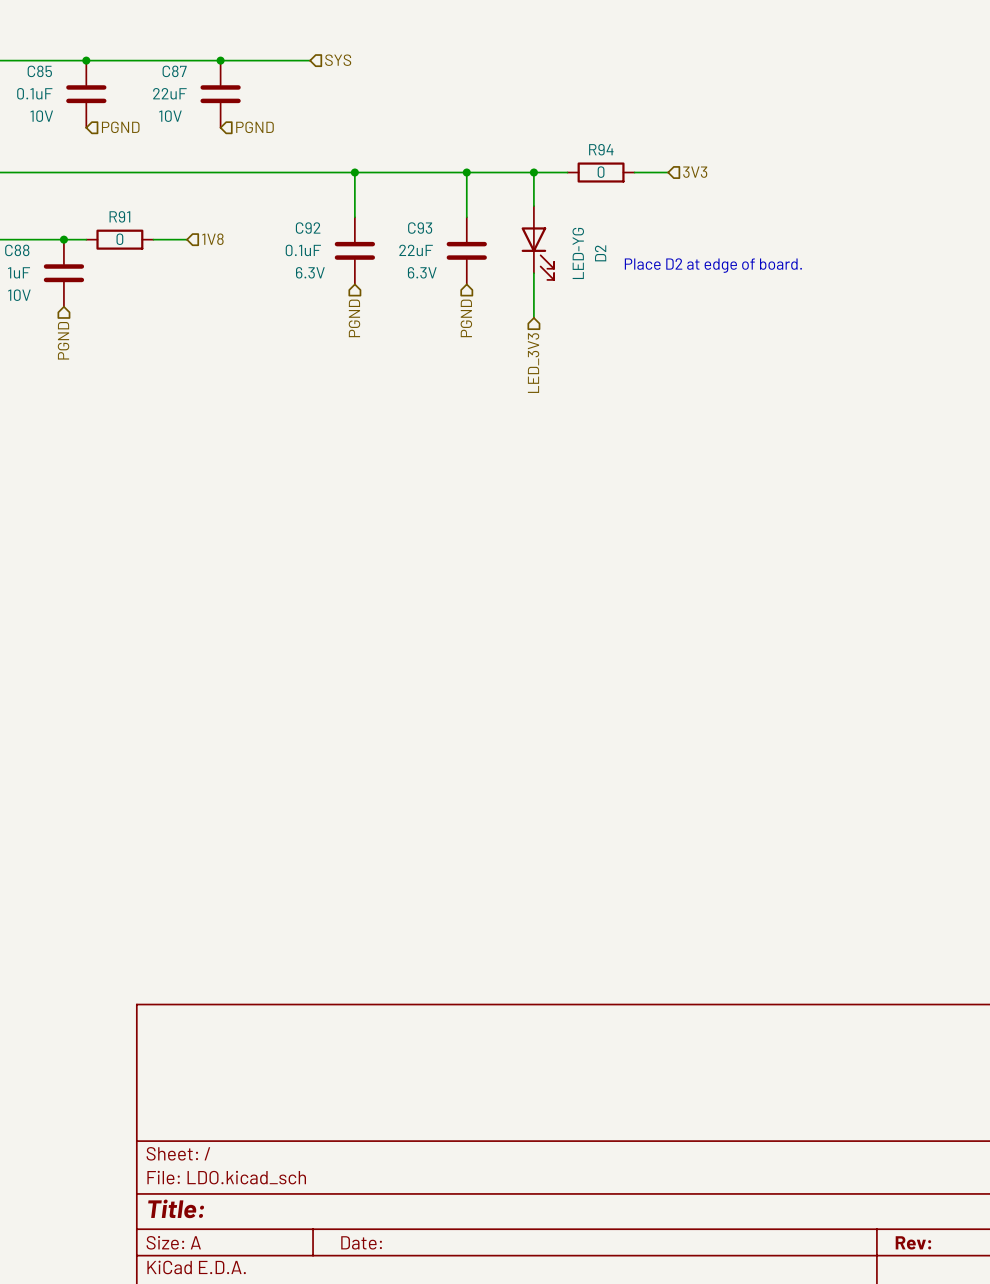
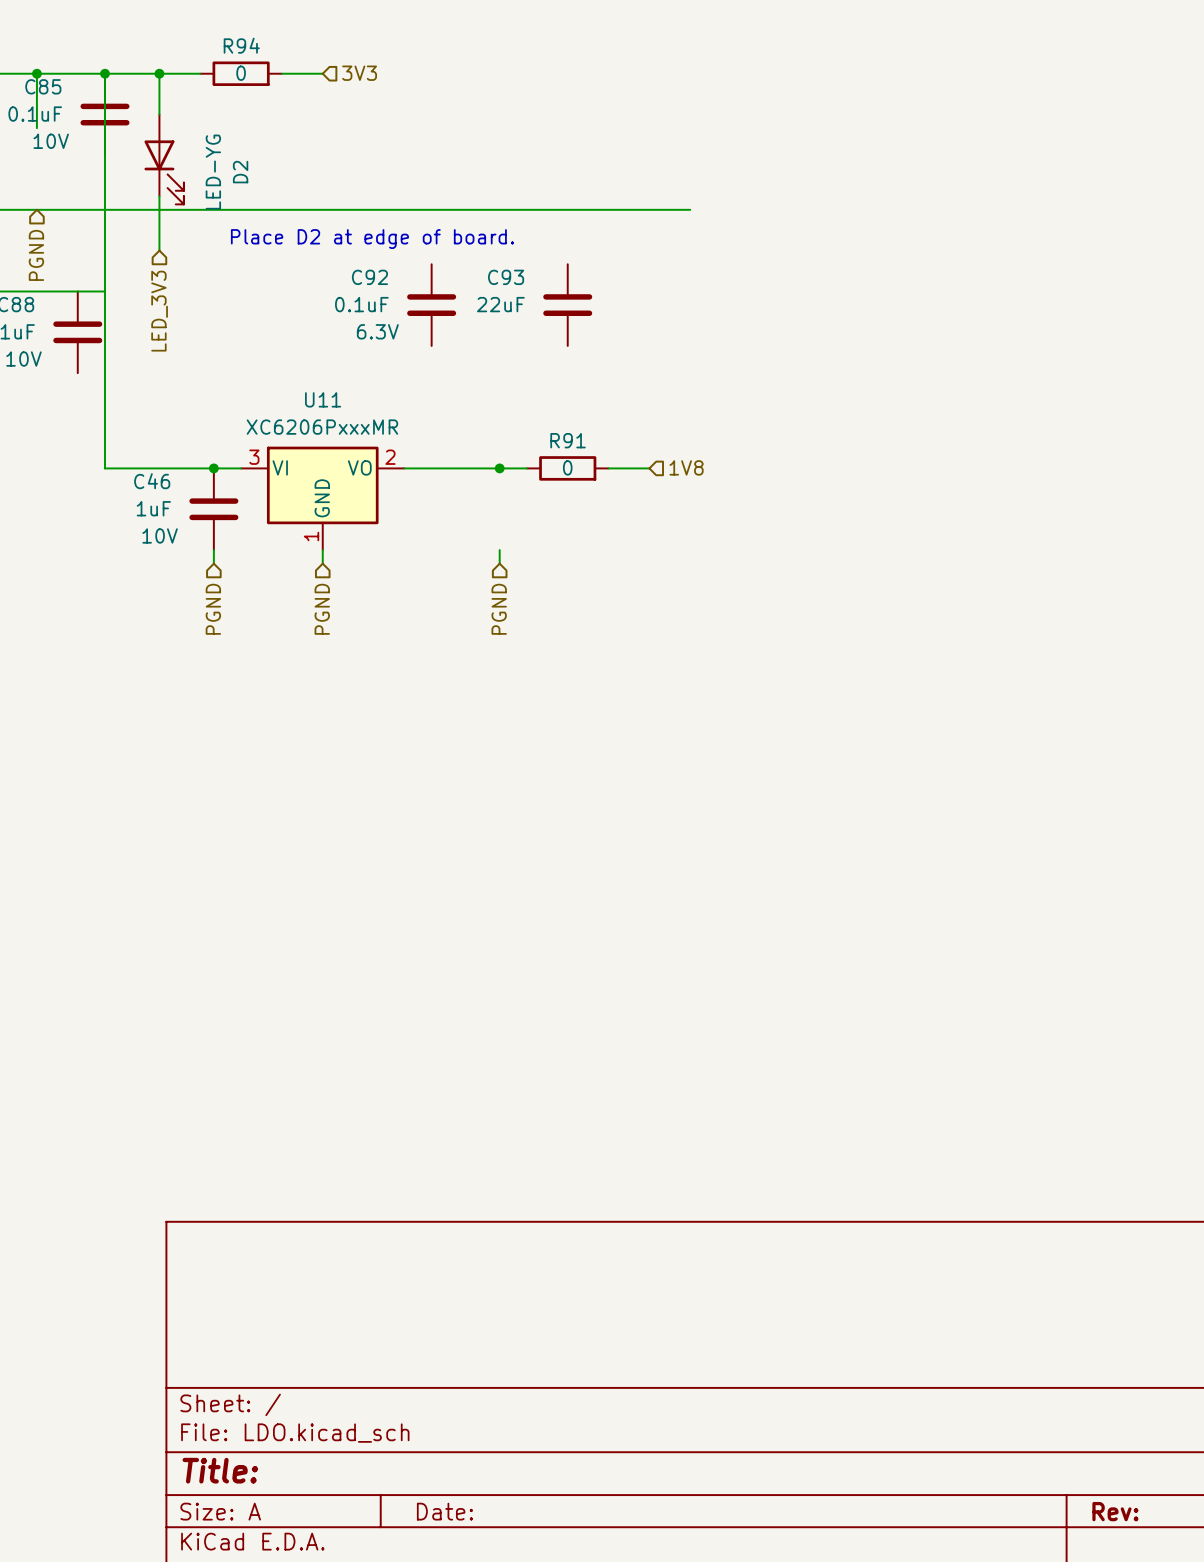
wire: none -> (36, 73) (36, 128)
junction: none -> (36, 73)
wire: none -> (104, 73) (104, 468) (241, 468)
wire: none -> (159, 73) (159, 114)
junction: none -> (159, 73)
wire: (164, 60) (231, 60) -> none
junction: (220, 60) -> none
wire: (265, 60) (310, 60) -> none
hierarchical label: none -> 3V3 (359, 73)
hierarchical label: SYS (338, 60) -> none
C87: 22uF (220, 94) -> none
hierarchical label: PGND (120, 127) -> none
hierarchical label: PGND (254, 127) -> none
wire: none -> (159, 196) (159, 250)
wire: (354, 172) (354, 217) -> none
junction: (354, 172) -> none
wire: (466, 172) (466, 217) -> none
junction: (466, 172) -> none
wire: (533, 172) (533, 206) -> none
junction: (533, 172) -> none
R94 position: (601, 172) -> (241, 73)
wire: (634, 172) (668, 172) -> none
hierarchical label: 3V3 (695, 172) -> none
text: none -> Place D2 at edge of board. (372, 239)
hierarchical label: none -> PGND (36, 255)
junction: (63, 239) -> none
R91 position: (119, 239) -> (567, 468)
wire: (153, 239) (187, 239) -> none
hierarchical label: 1V8 (212, 239) -> none
D2 position: (537, 243) -> (164, 159)
hierarchical label: none -> LED_3V3 (159, 311)
text: Place D2 at edge of board. (713, 265) -> none
C93 text: 6.3V (422, 272) -> none
wire: (533, 273) (533, 317) -> none
hierarchical label: PGND (354, 318) -> none
hierarchical label: PGND (466, 318) -> none
hierarchical label: PGND (63, 340) -> none
hierarchical label: LED_3V3 (533, 363) -> none
hierarchical label: none -> 1V8 (686, 467)
junction: none -> (213, 468)
wire: none -> (404, 468) (526, 468)
junction: none -> (499, 468)
wire: none -> (608, 468) (649, 468)
U11: none -> XC6206PxxxMR (322, 498)
C46: none -> 1uF (213, 509)
wire: none -> (213, 550) (213, 563)
wire: none -> (322, 550) (322, 563)
wire: none -> (499, 550) (499, 563)
hierarchical label: none -> PGND (213, 609)
hierarchical label: none -> PGND (322, 609)
hierarchical label: none -> PGND (499, 609)

